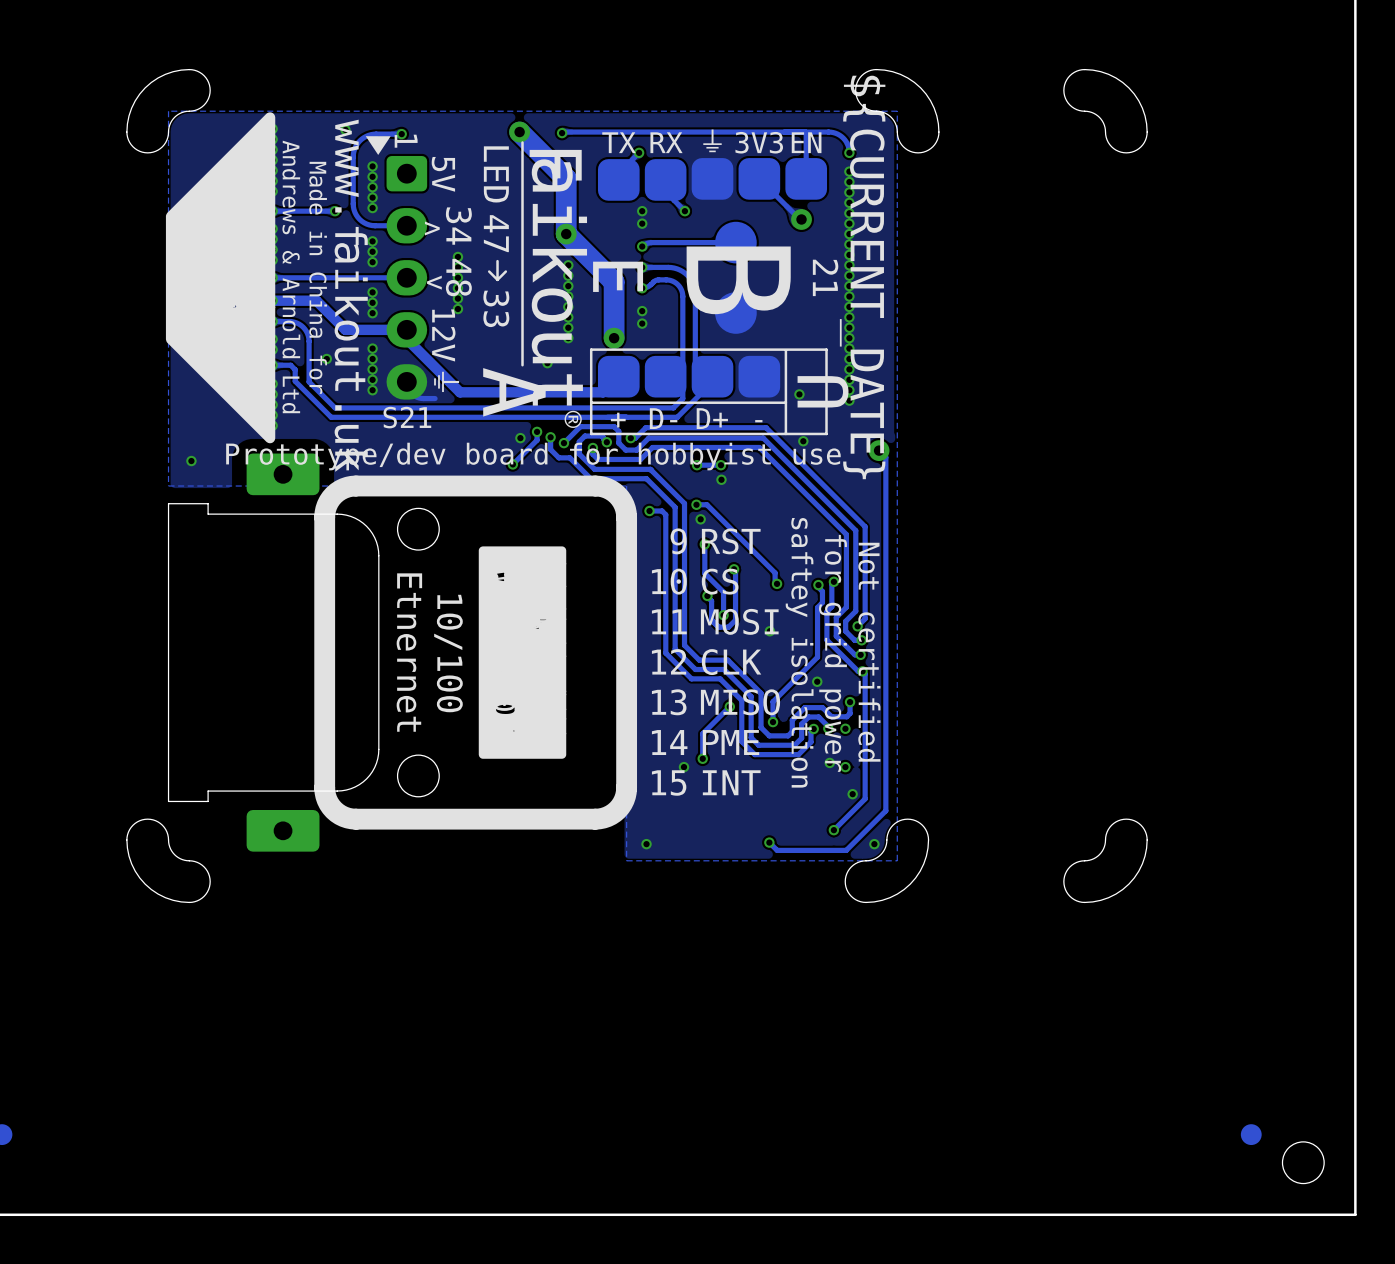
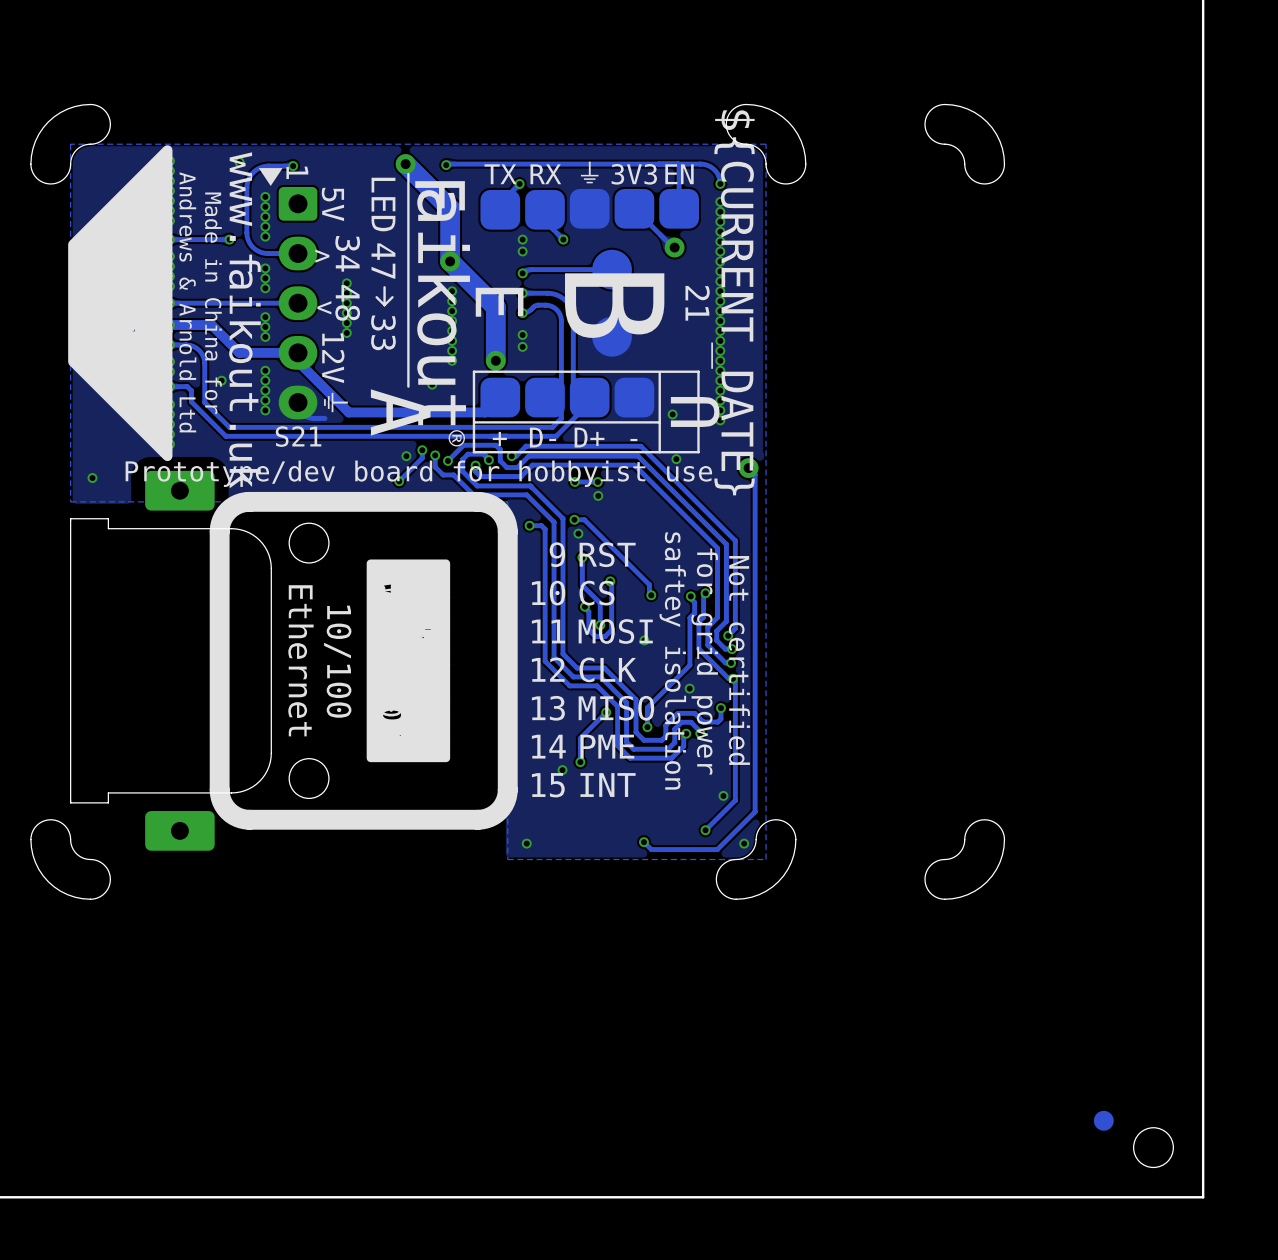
text: Etnernet (409, 652) -> Ethernet (300, 660)
via: (845, 728) -> none
via: (829, 762) -> none
via: (845, 767) -> none

